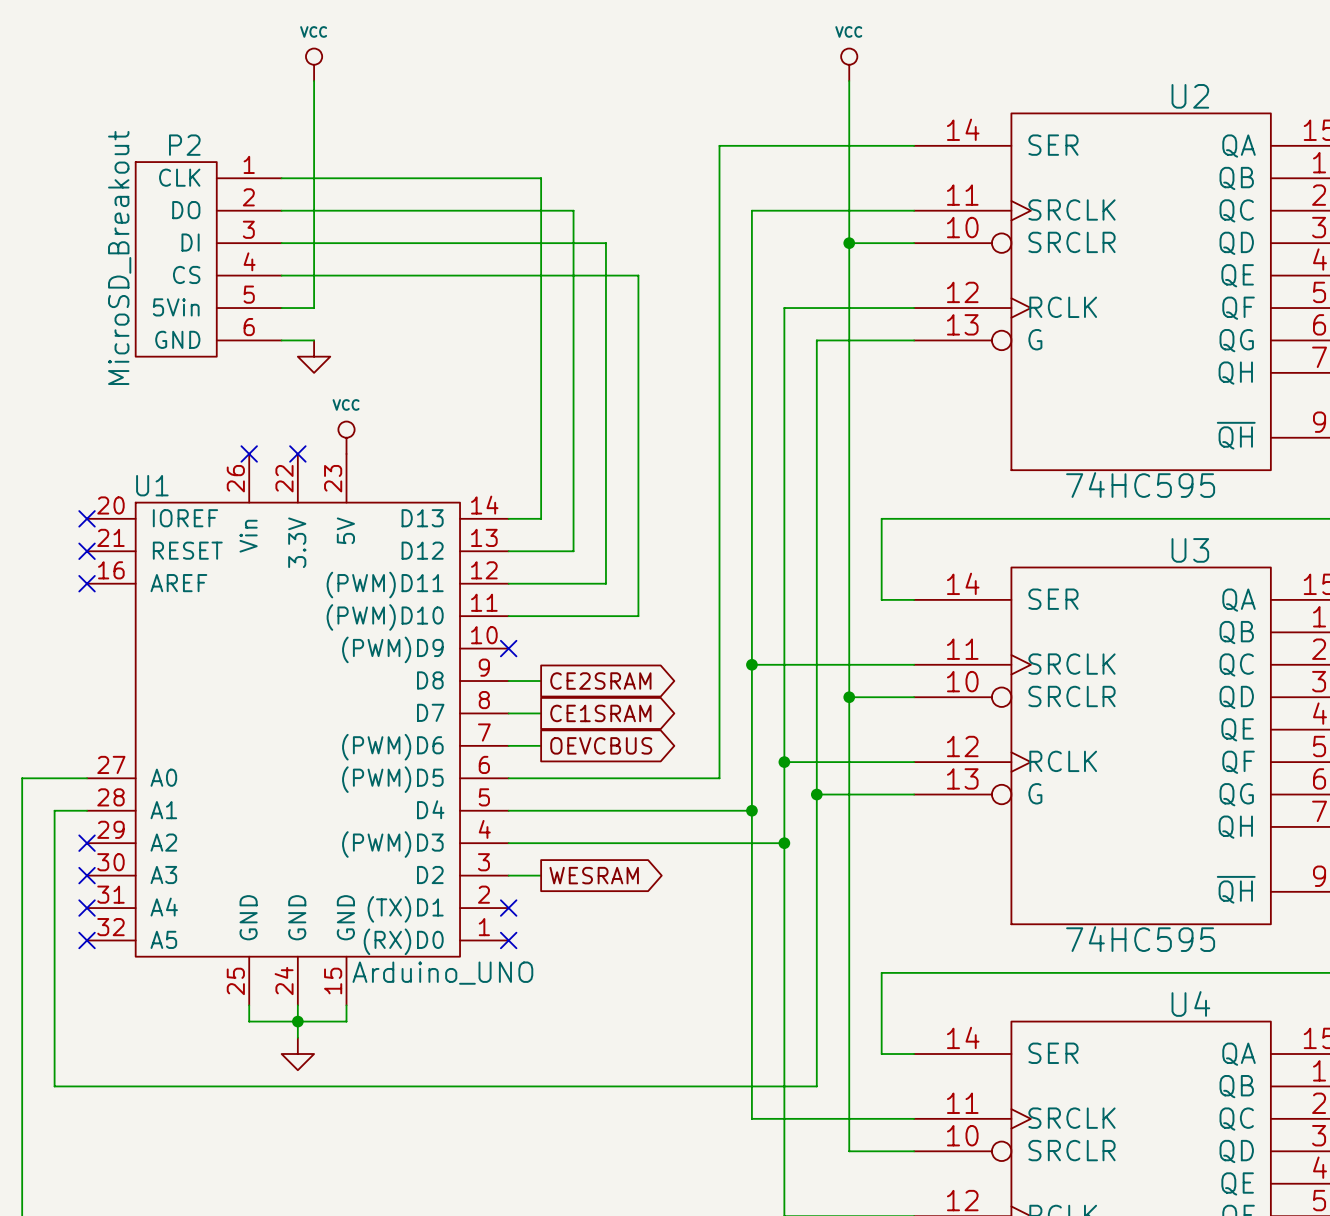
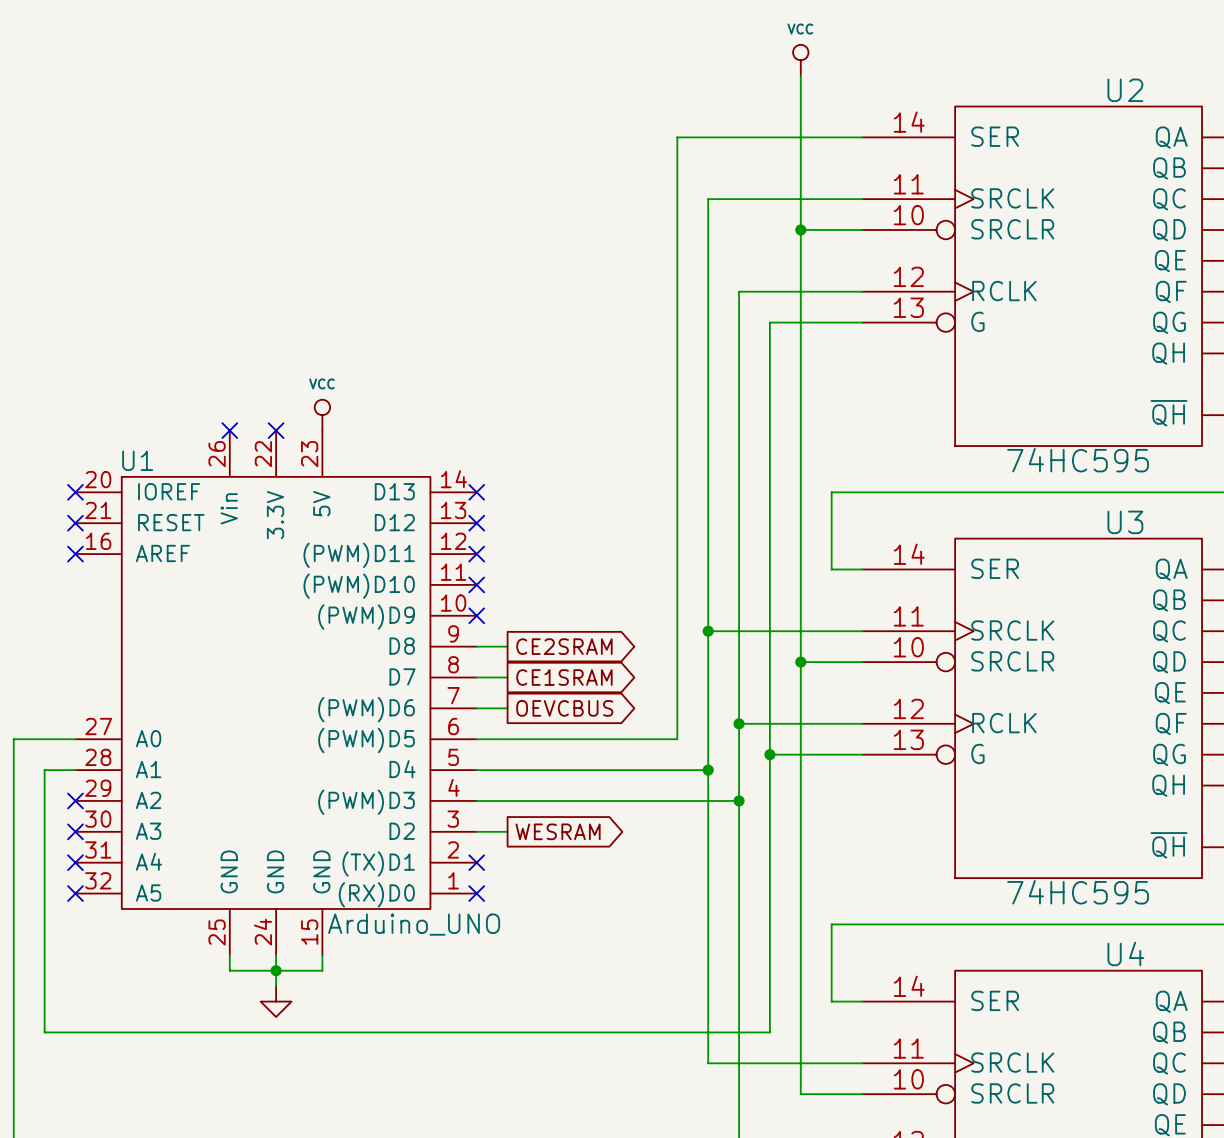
power symbol: VCC (314, 64) -> none
wire: (314, 80) (314, 308) (281, 308) -> none
wire: (281, 178) (541, 178) (541, 518) (508, 518) -> none
wire: (281, 210) (573, 210) (573, 551) (508, 551) -> none
wire: (281, 243) (605, 243) (605, 583) (508, 583) -> none
P2: MicroSD_Breakout (208, 259) -> none
wire: (281, 275) (638, 275) (638, 616) (508, 616) -> none
wire: (281, 340) (314, 340) -> none
power symbol: (314, 356) -> none
no-connect mark: none -> (476, 492)
no-connect mark: none -> (476, 523)
no-connect mark: none -> (476, 554)
no-connect mark: none -> (476, 584)

